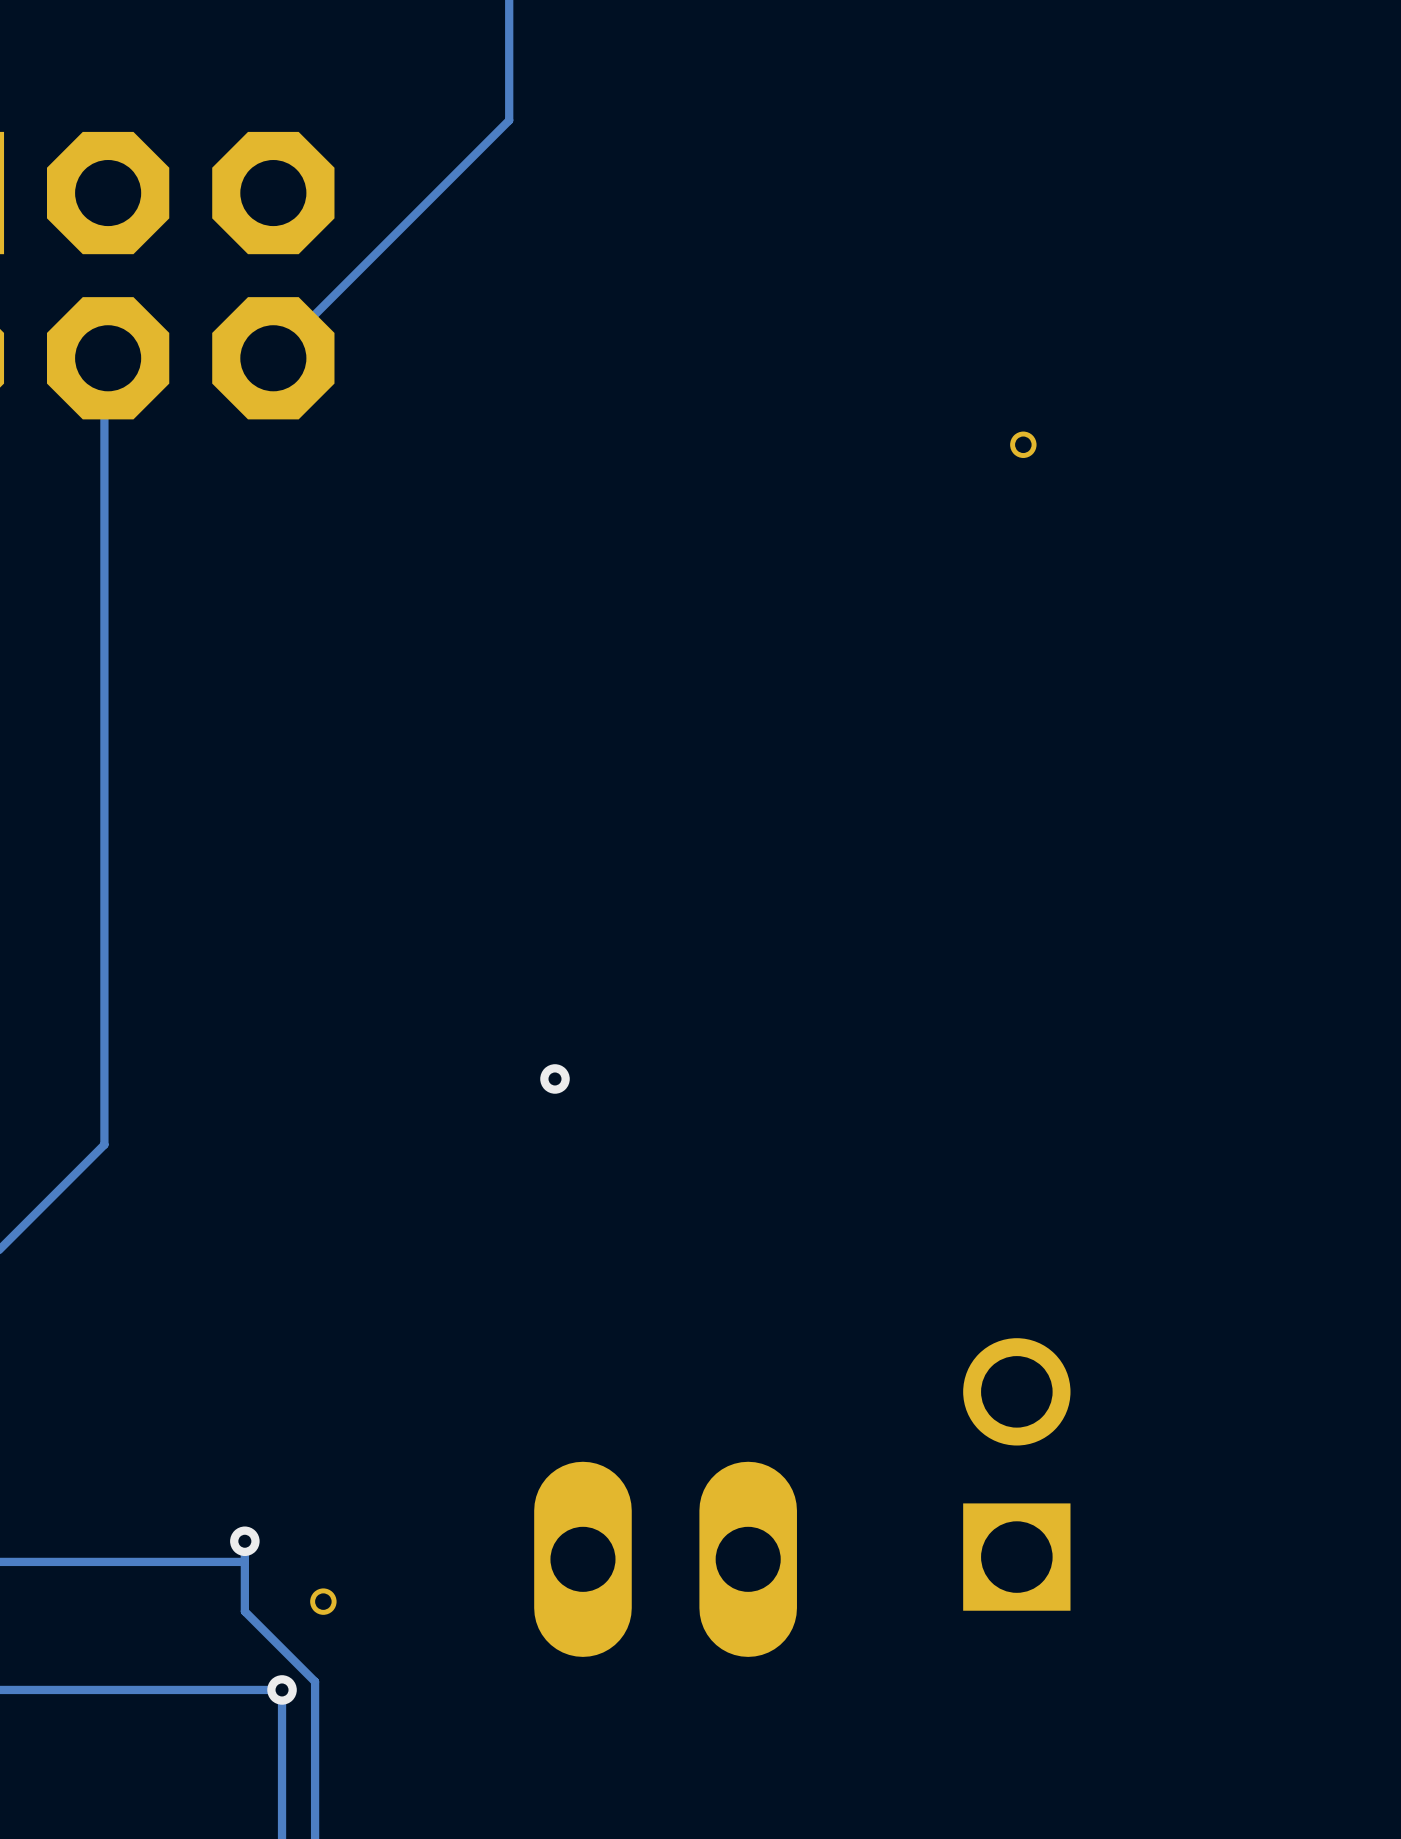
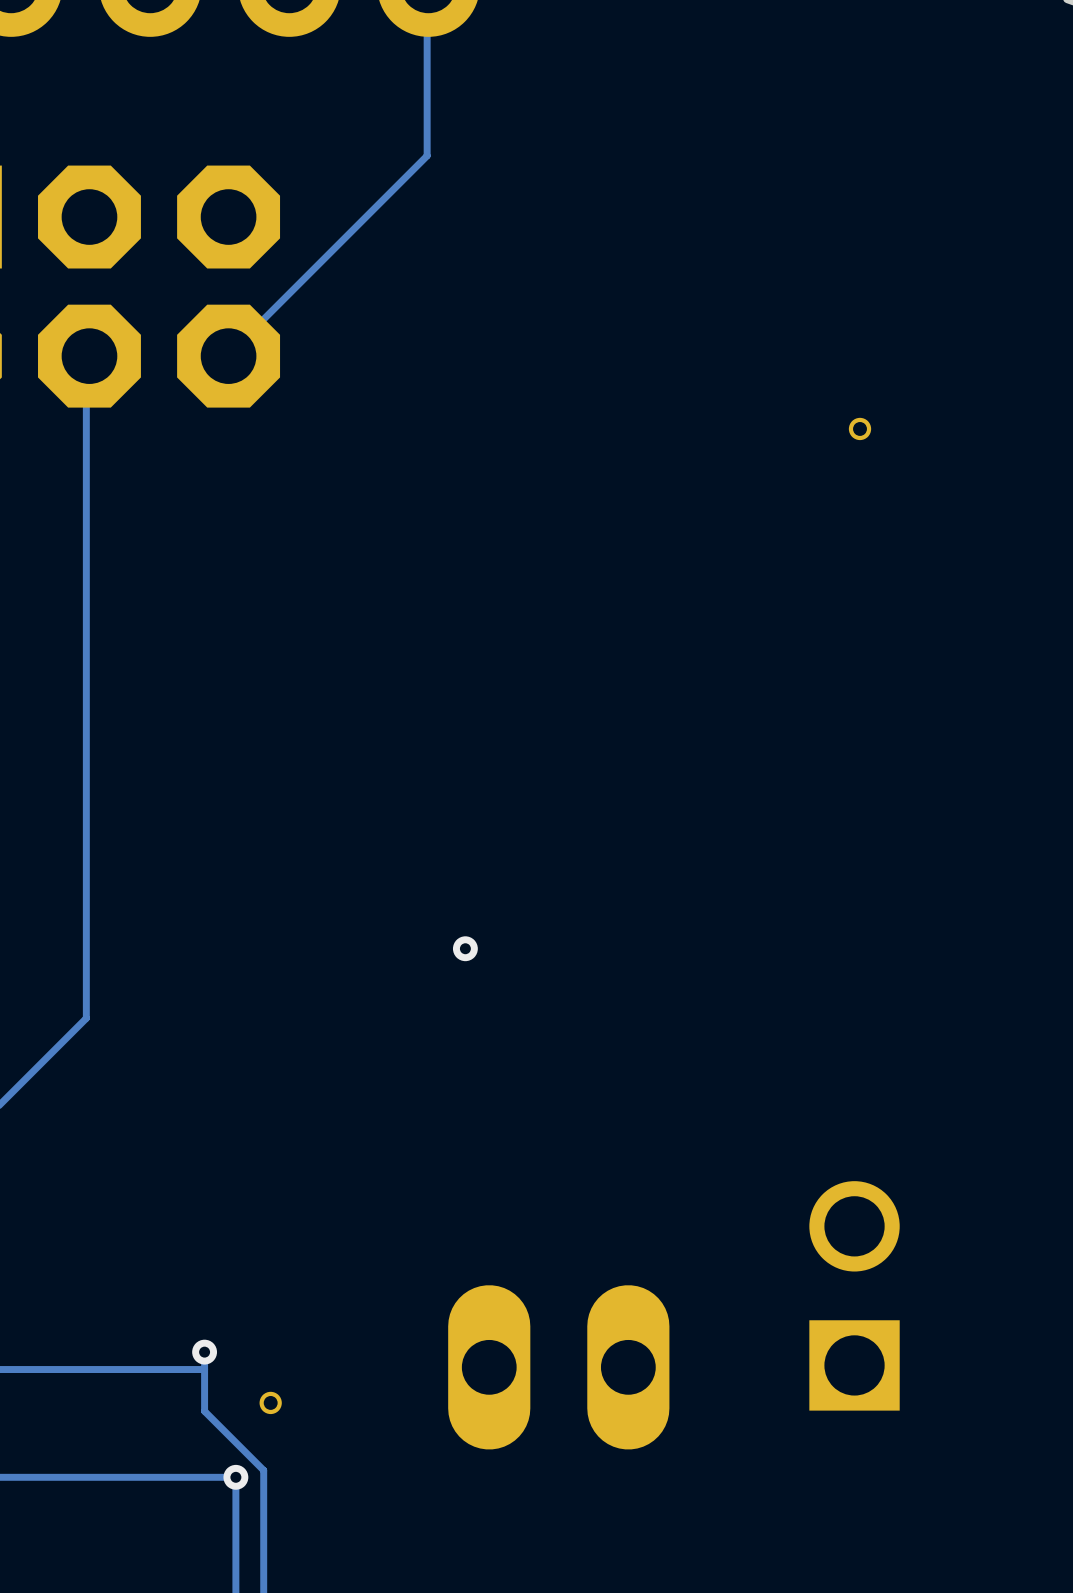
via position: (555, 1078) -> (465, 948)

